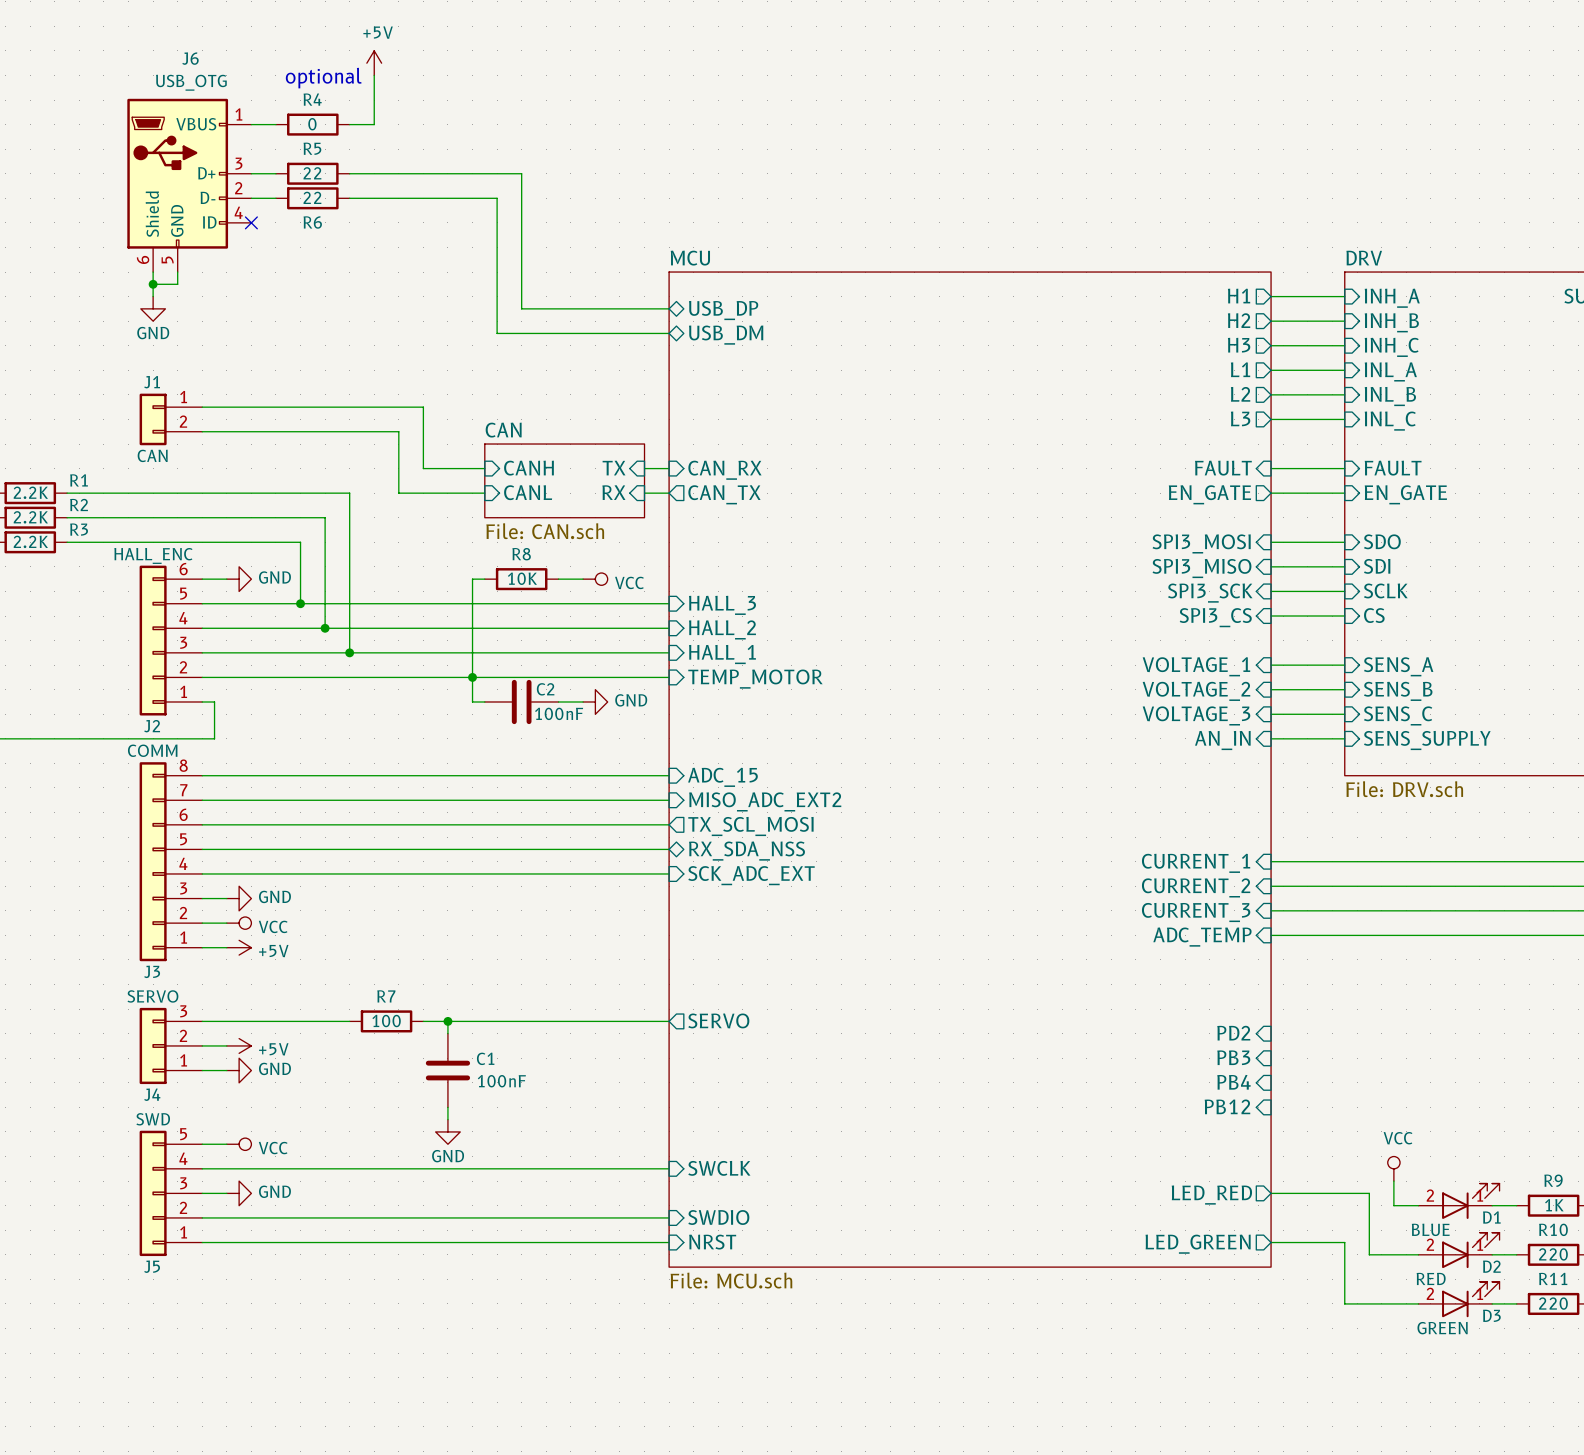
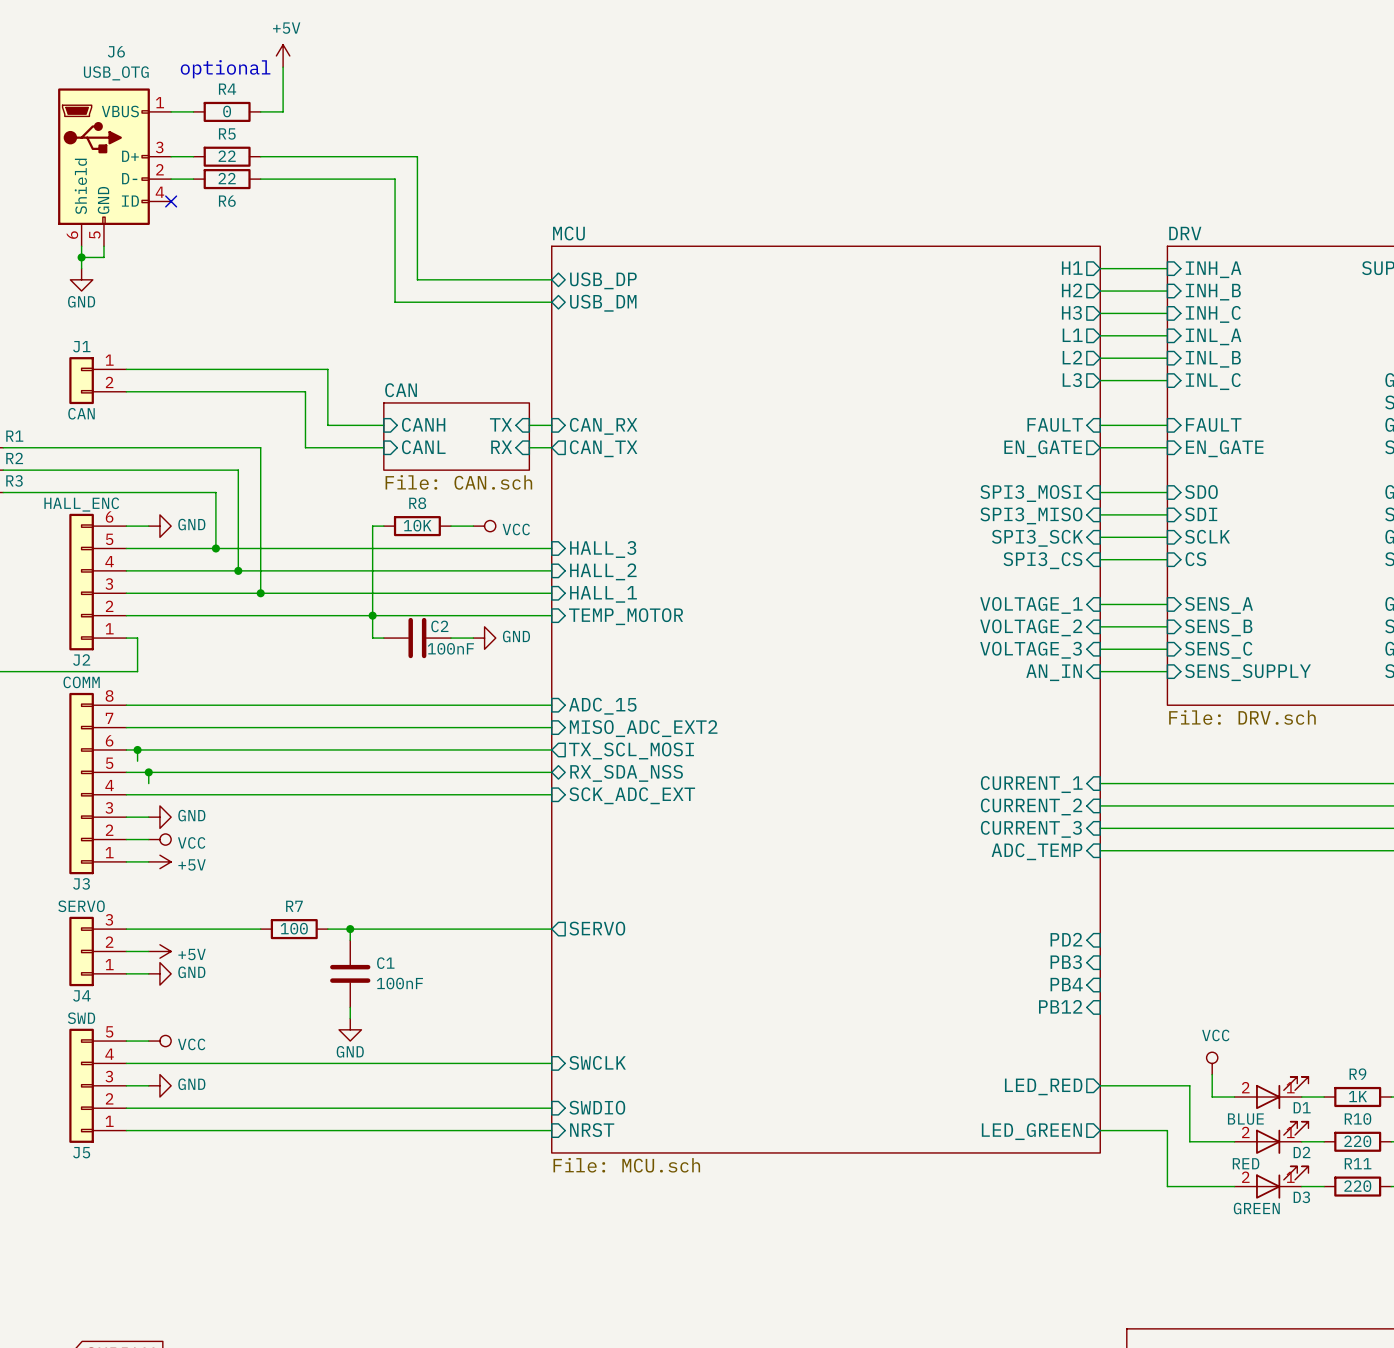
wire: none -> (137, 749) (137, 761)
junction: none -> (137, 749)
wire: none -> (148, 772) (148, 783)
junction: none -> (148, 772)

